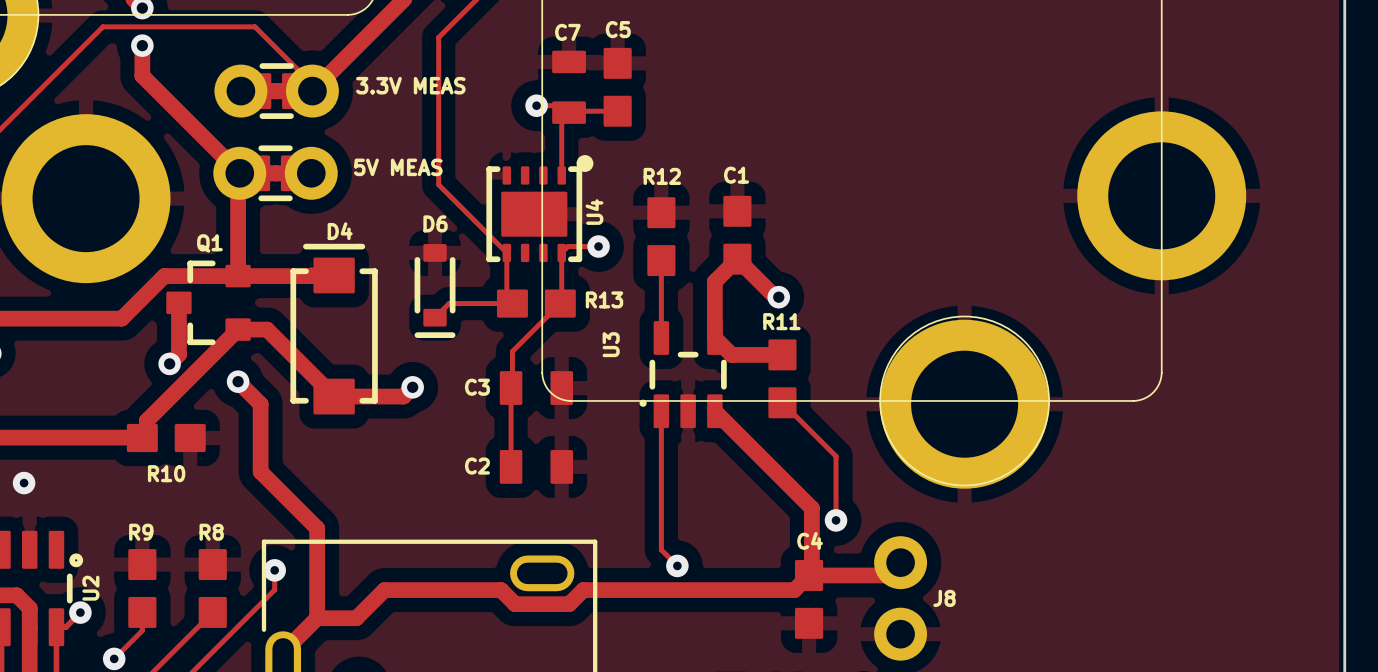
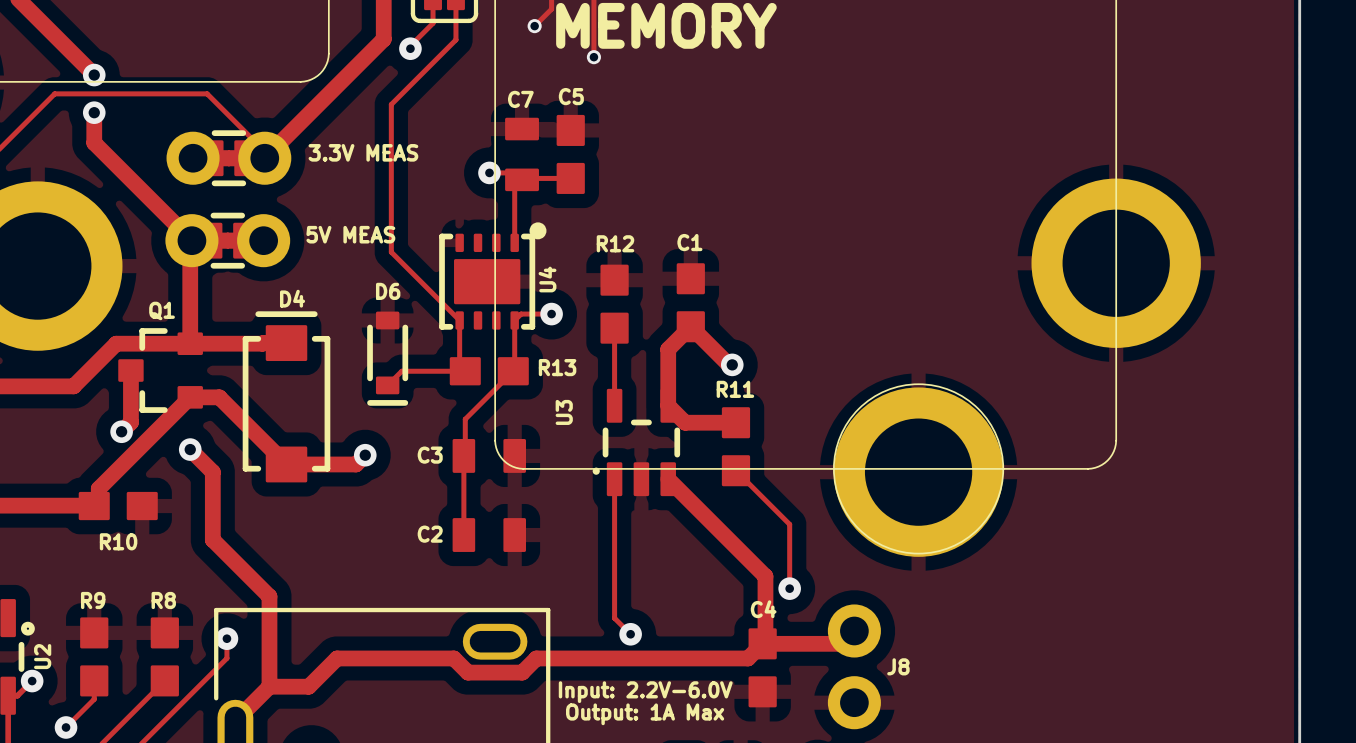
text: none -> Input: 2.2V-6.0V (645, 692)
text: none -> Output: 1A Max (645, 714)

